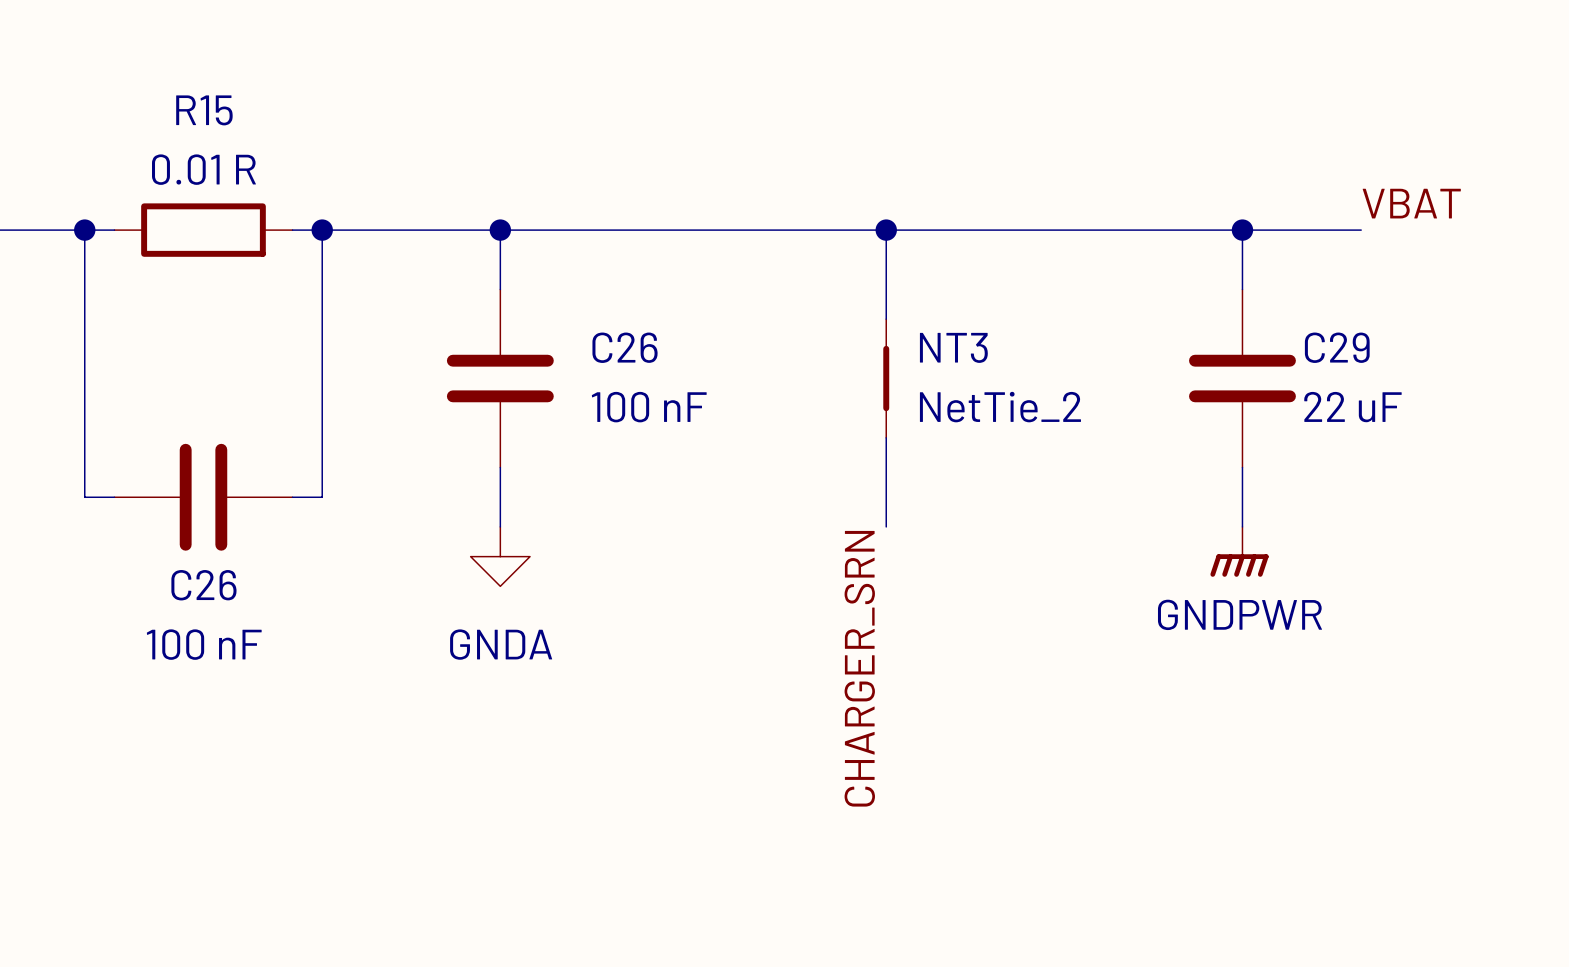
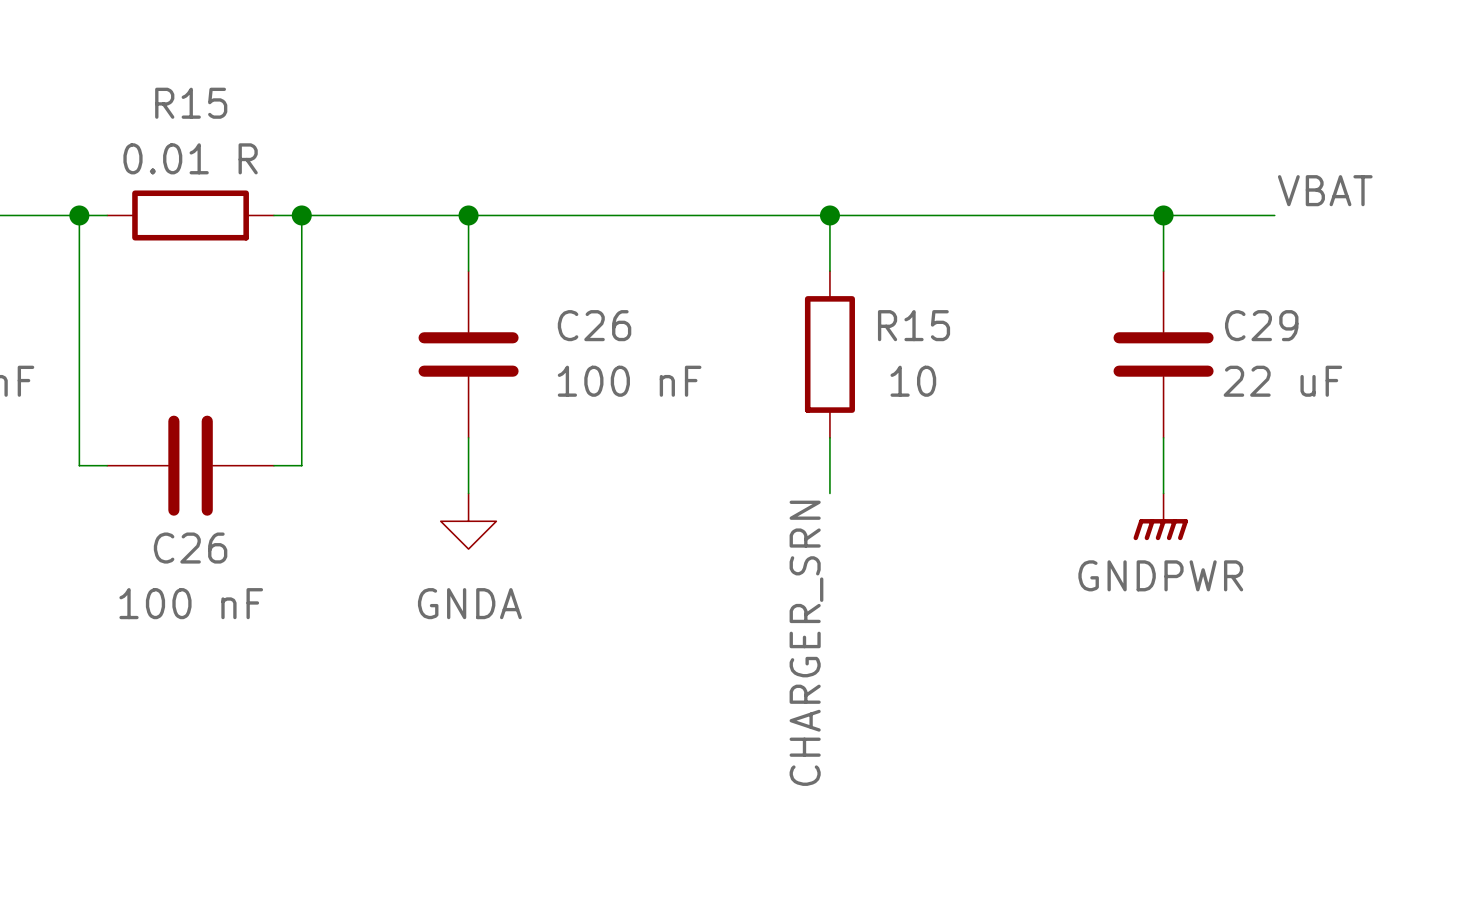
NT3: NetTie_2 (886, 378) -> none
R15: none -> 10 (829, 354)

